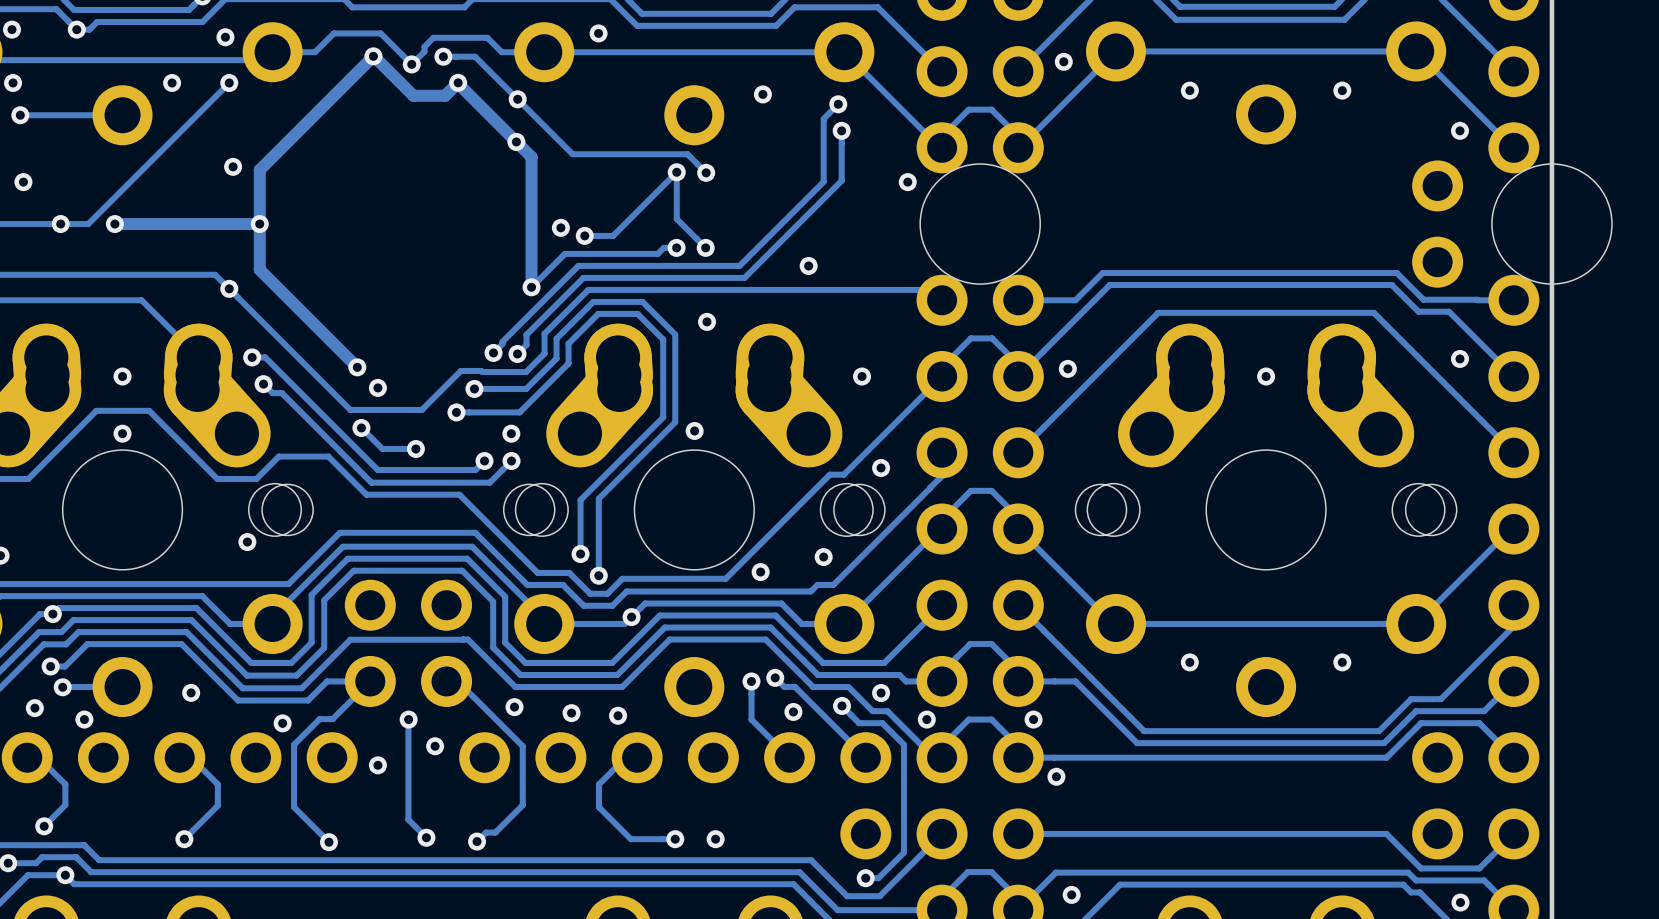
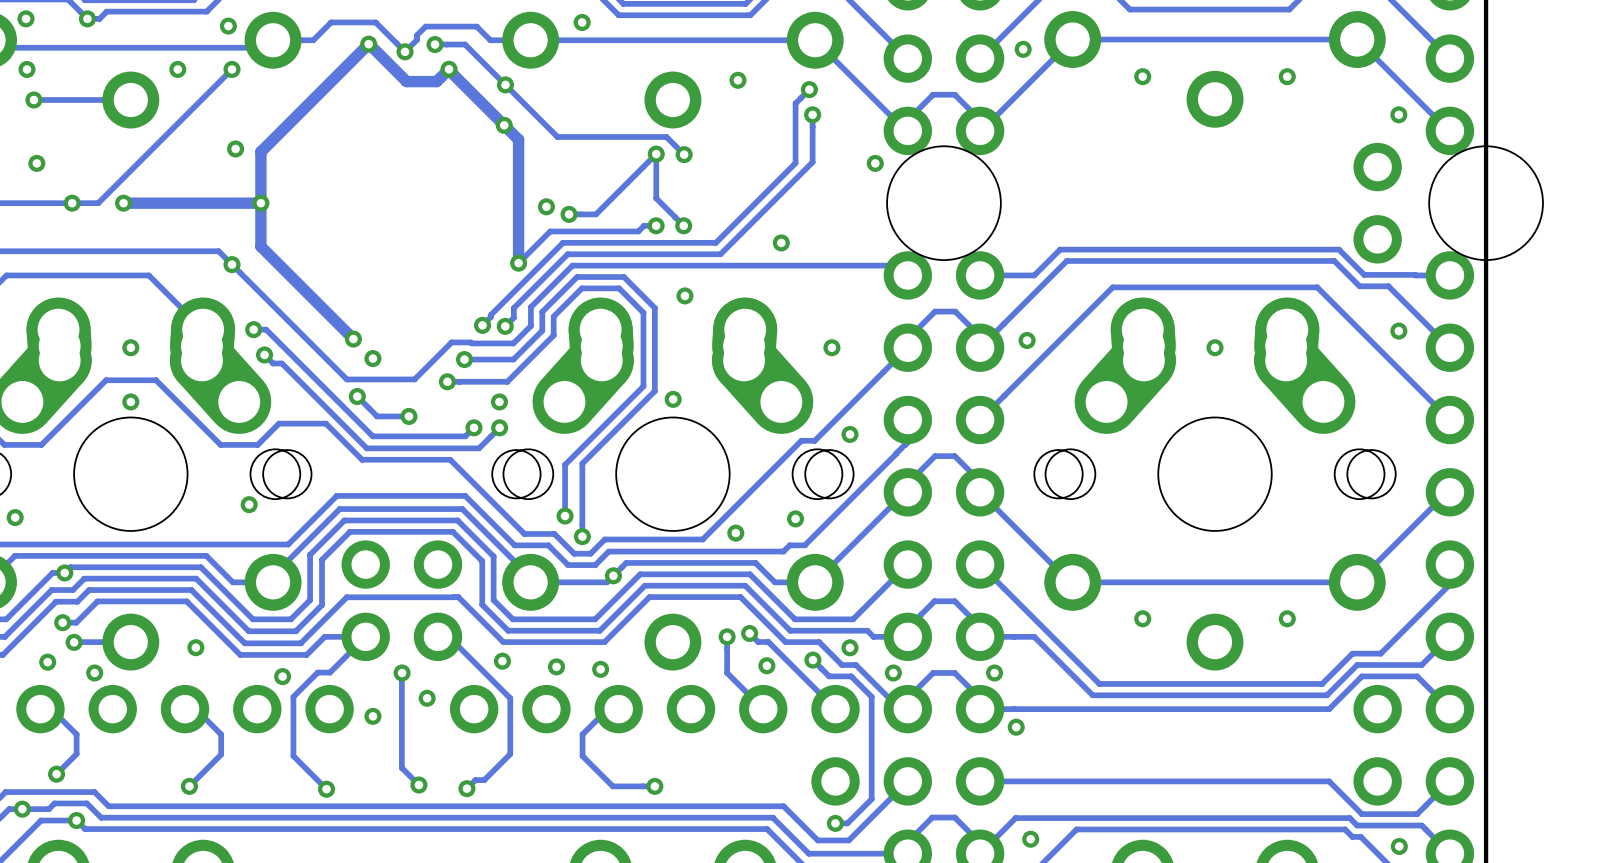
via: (715, 839) -> none

